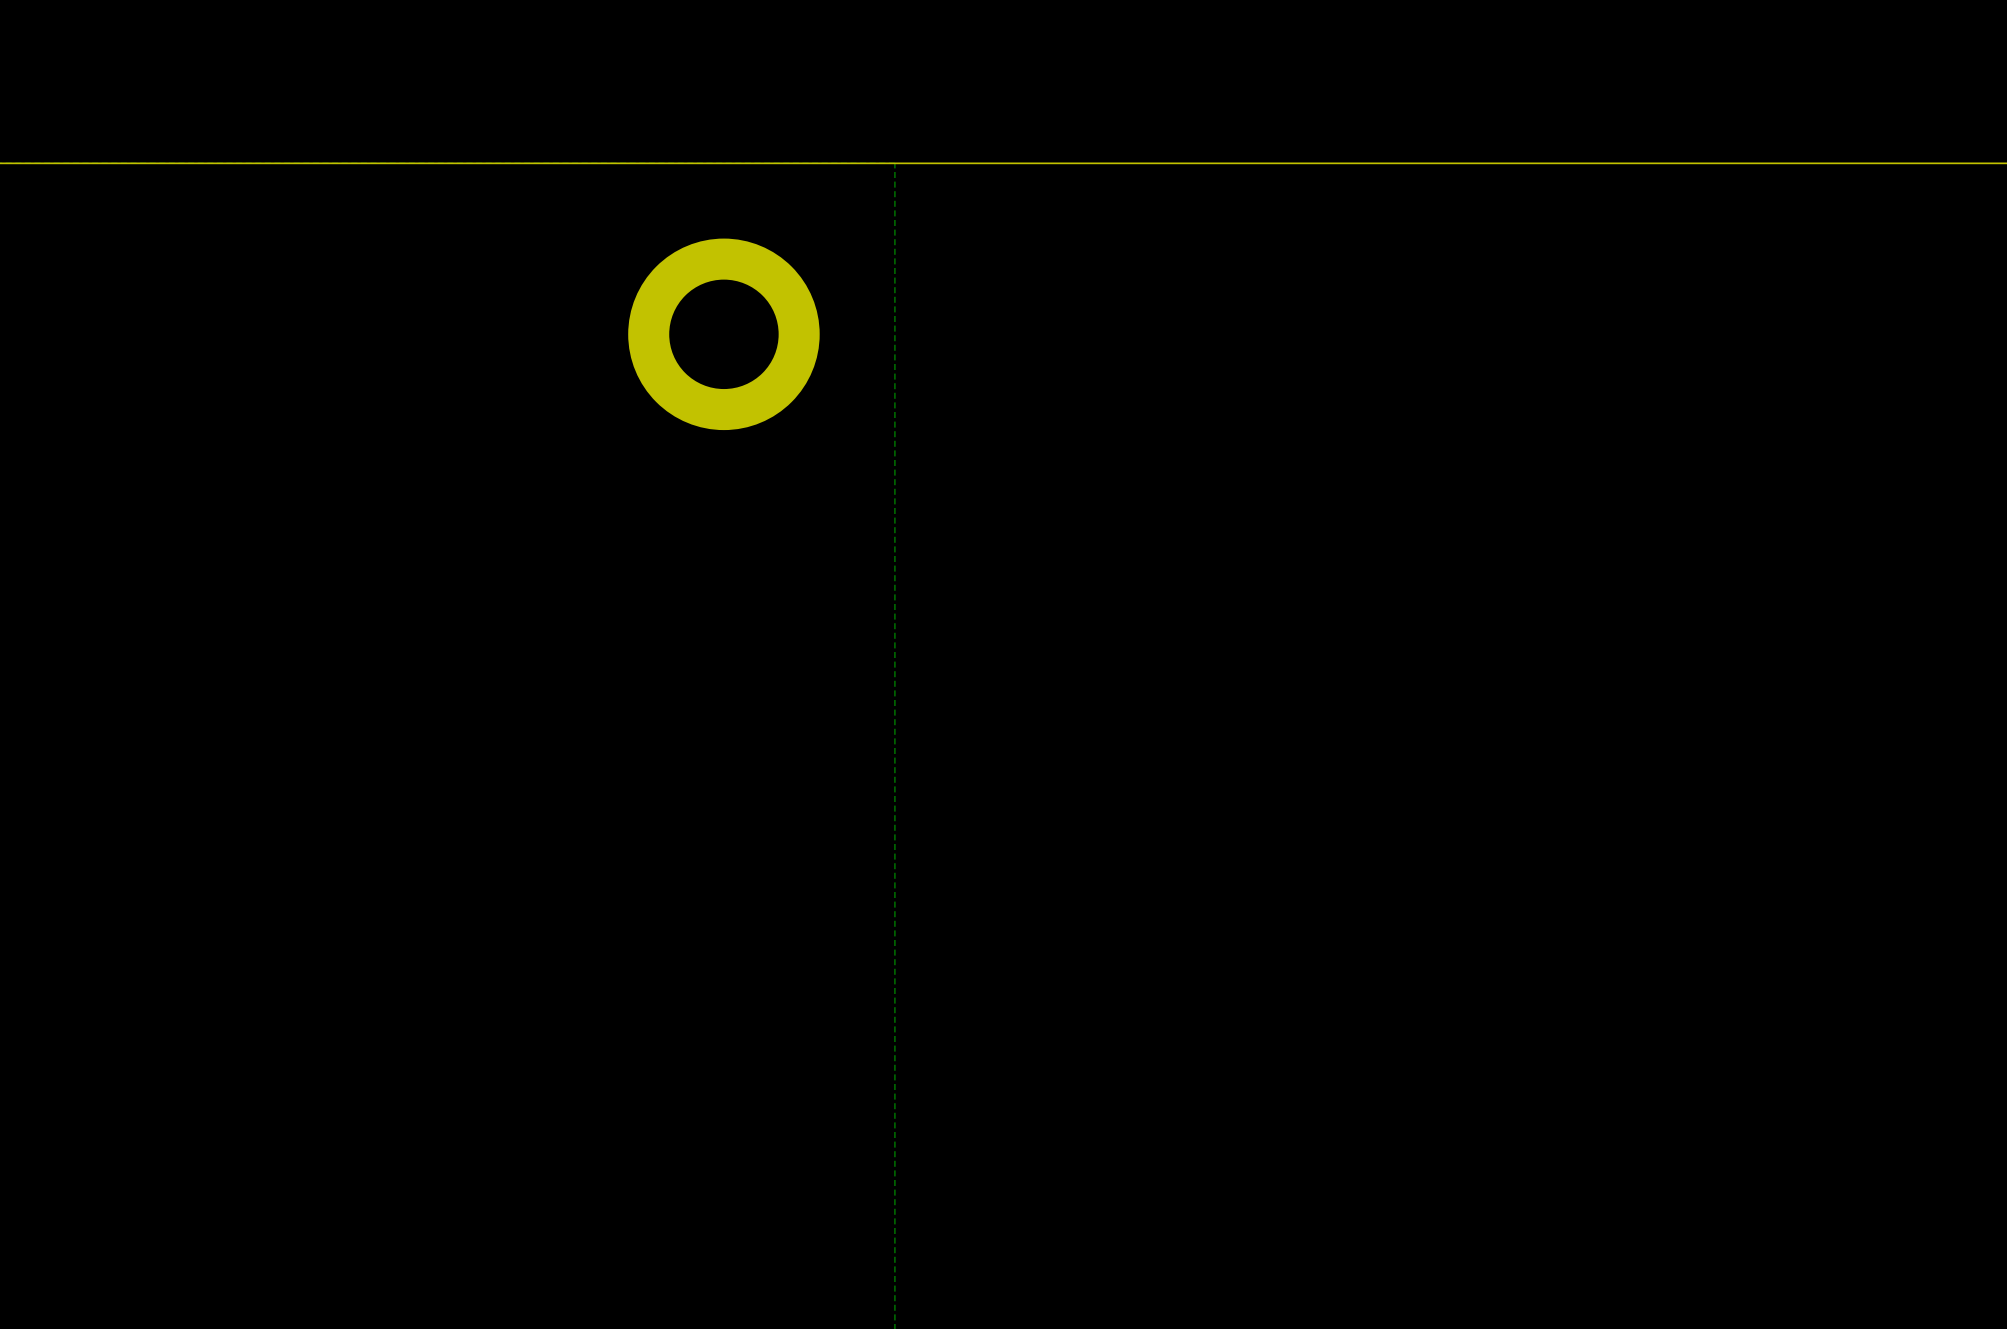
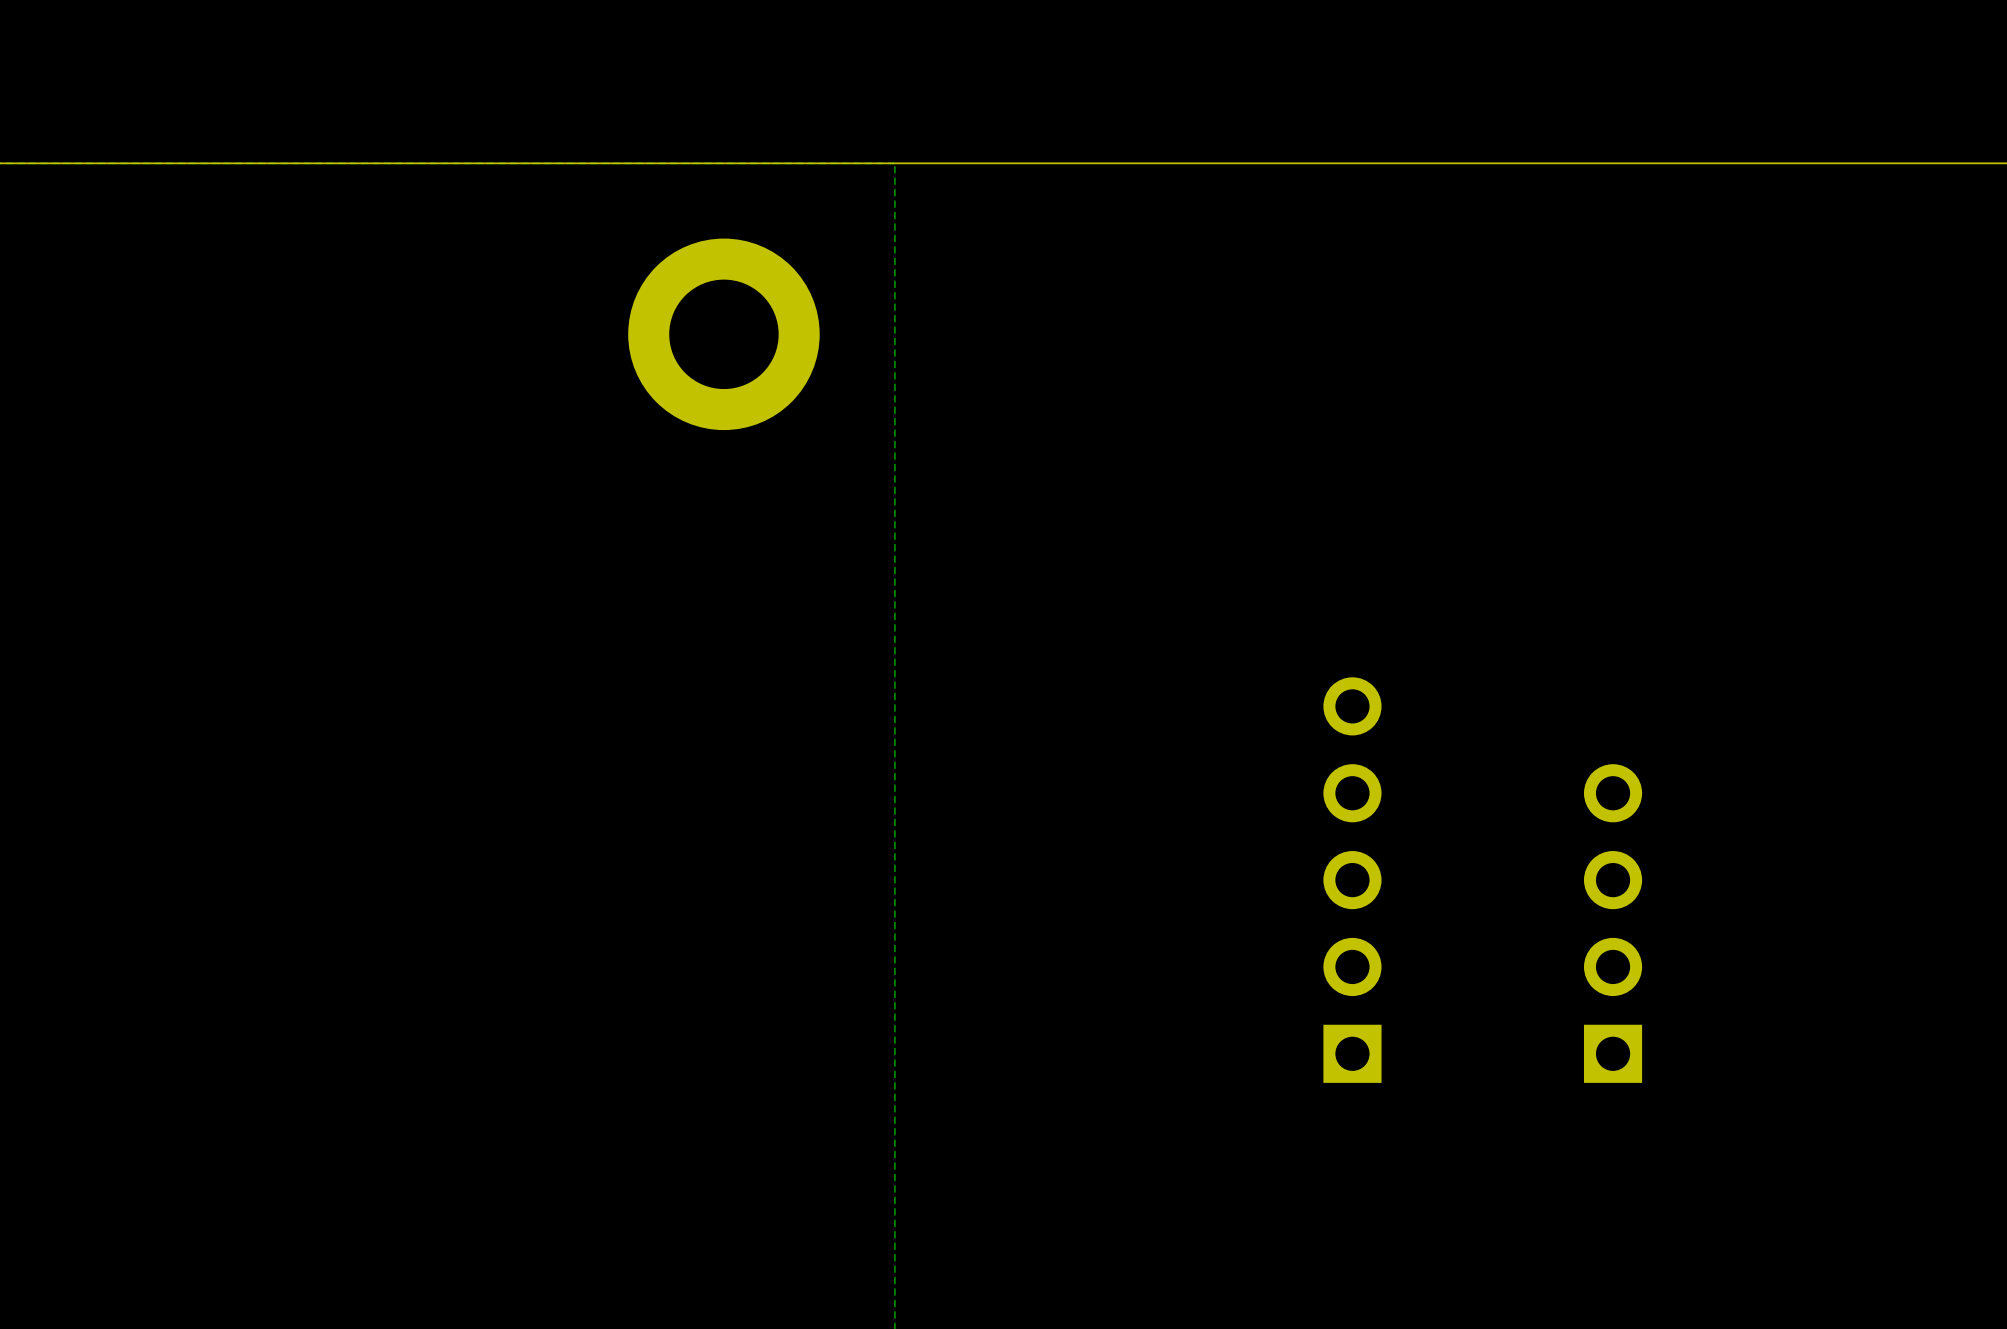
part: none -> (1352, 880)
part: none -> (1613, 923)

